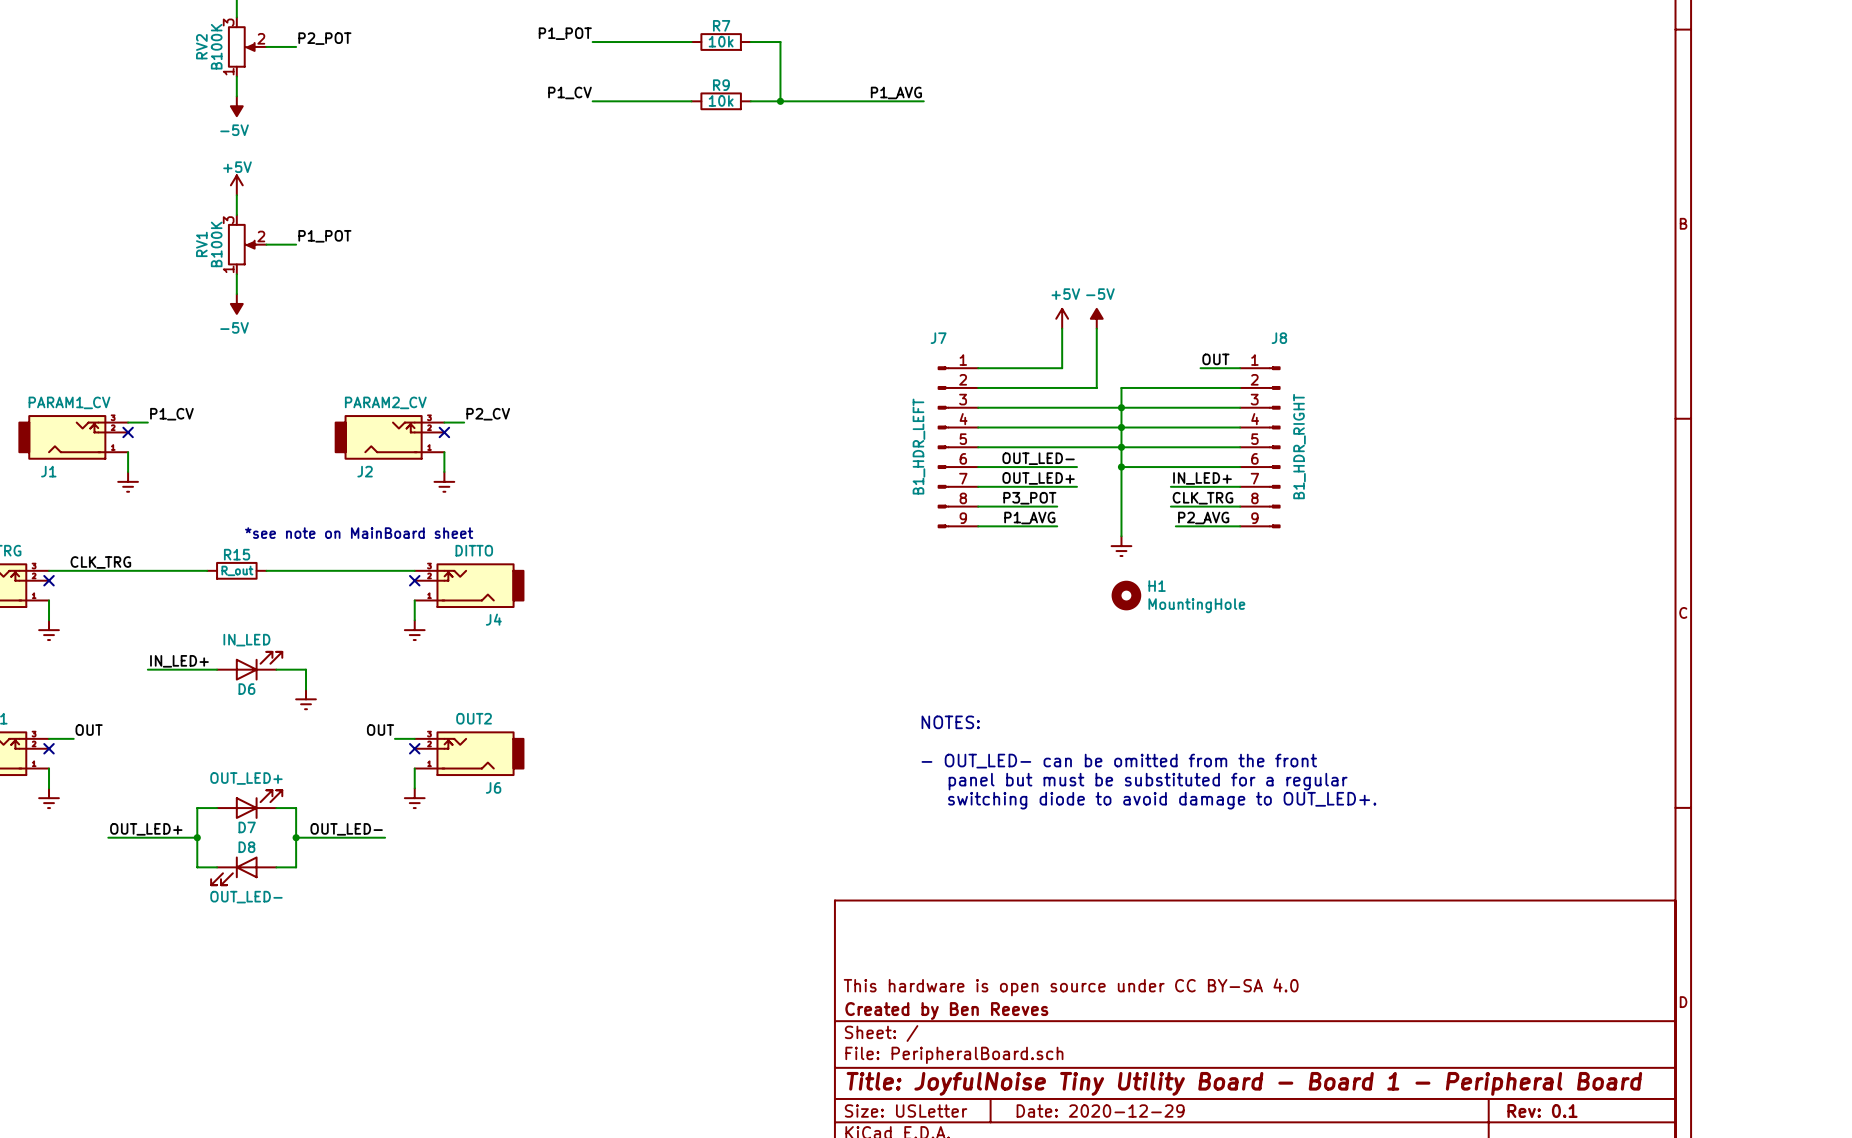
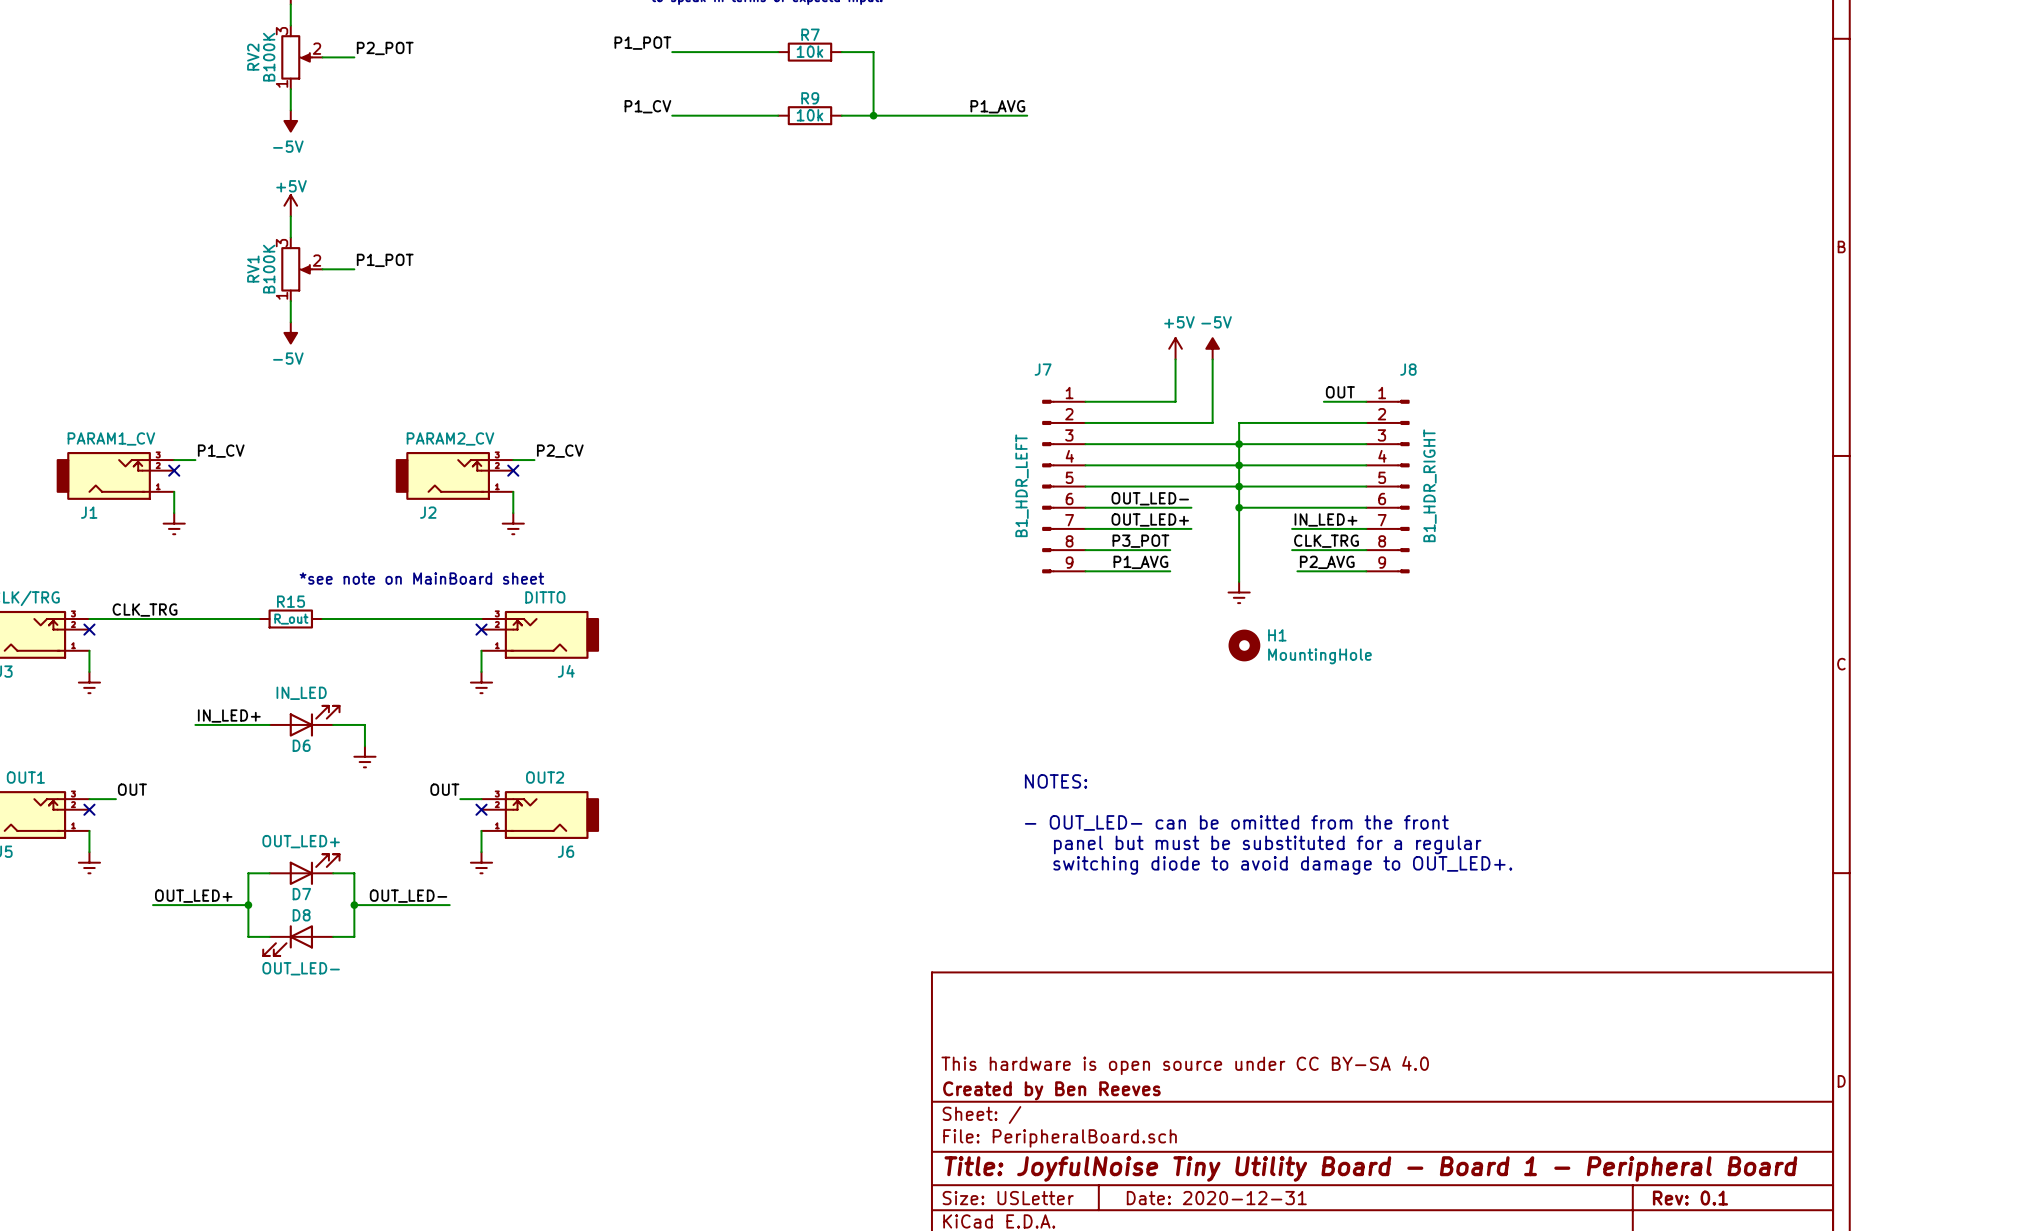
title block: Date: 2020-12-29 (1100, 1111) -> Date: 2020-12-31 (1216, 1198)

